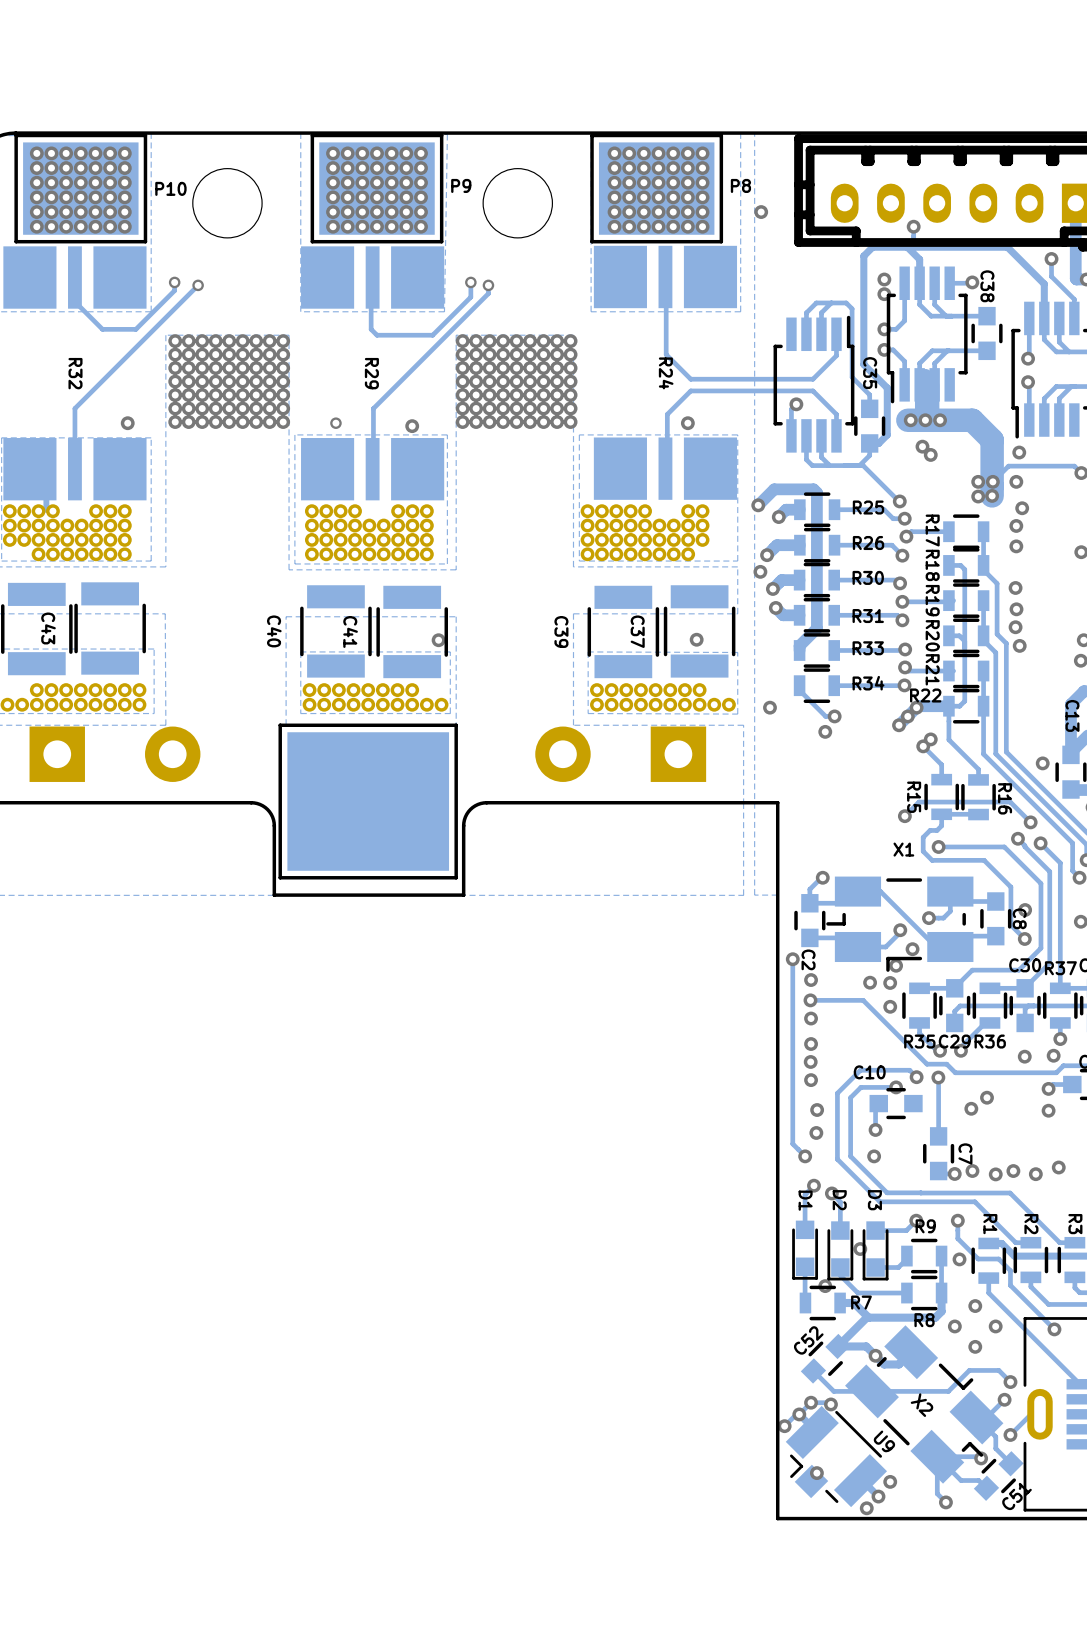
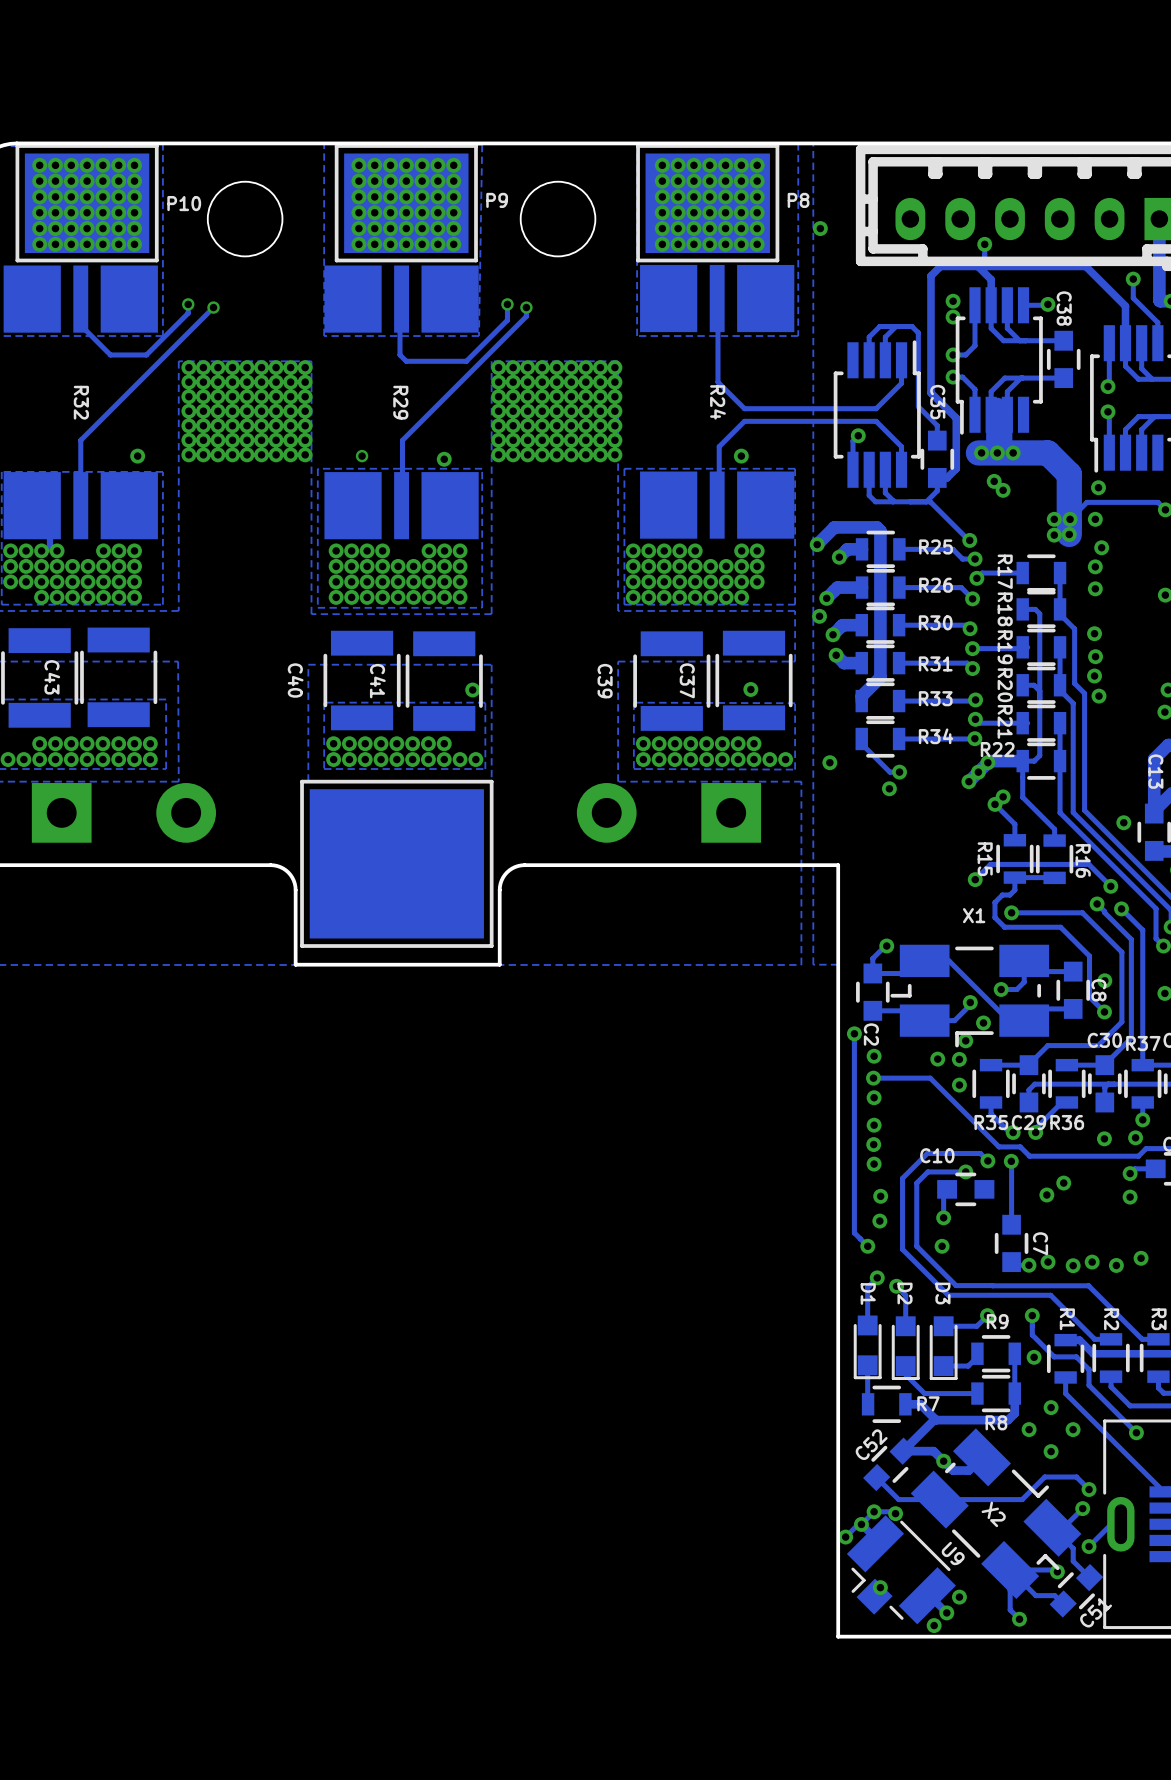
via: (860, 1249) -> none
via: (825, 1286) -> none

